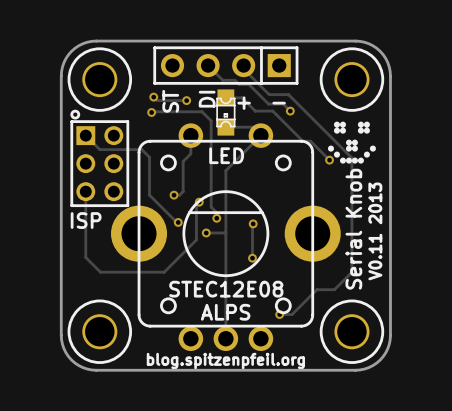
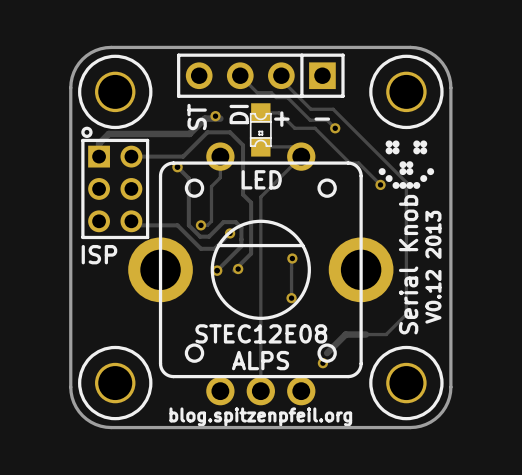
track: (153, 97) (157, 100) (186, 100) -> none
via: (153, 97) -> none
track: (151, 112) (202, 111) (211, 120) (211, 207) (216, 212) (216, 218) -> none
via: (151, 112) -> none
track: (85, 135) (99, 149) (141, 149) (149, 157) (149, 195) (178, 222) -> (99, 156) (99, 143) (108, 133) (189, 133) (205, 118) (220, 118)
track: none -> (131, 156) (183, 156) (207, 132) (230, 132) (243, 145) (243, 194) (251, 202) (251, 253) (234, 270)
track: none -> (177, 167) (188, 178) (188, 225) (200, 236) (209, 236) (223, 222) (235, 222) (241, 227) (241, 246) (217, 270)
via: none -> (177, 167)
track: (85, 191) (85, 257) (100, 272) (164, 272) (196, 239) (196, 204) -> (131, 221) (135, 225) (177, 225) (200, 248) (214, 248) (226, 236)
via: (216, 218) -> none
via: (178, 222) -> none
text: V0.11 2013 (375, 231) -> V0.12 2013 (433, 267)
track: (206, 232) (225, 232) -> none
via: none -> (217, 270)
track: (316, 289) (292, 314) (279, 314) -> (365, 334) (345, 334) (327, 353)

